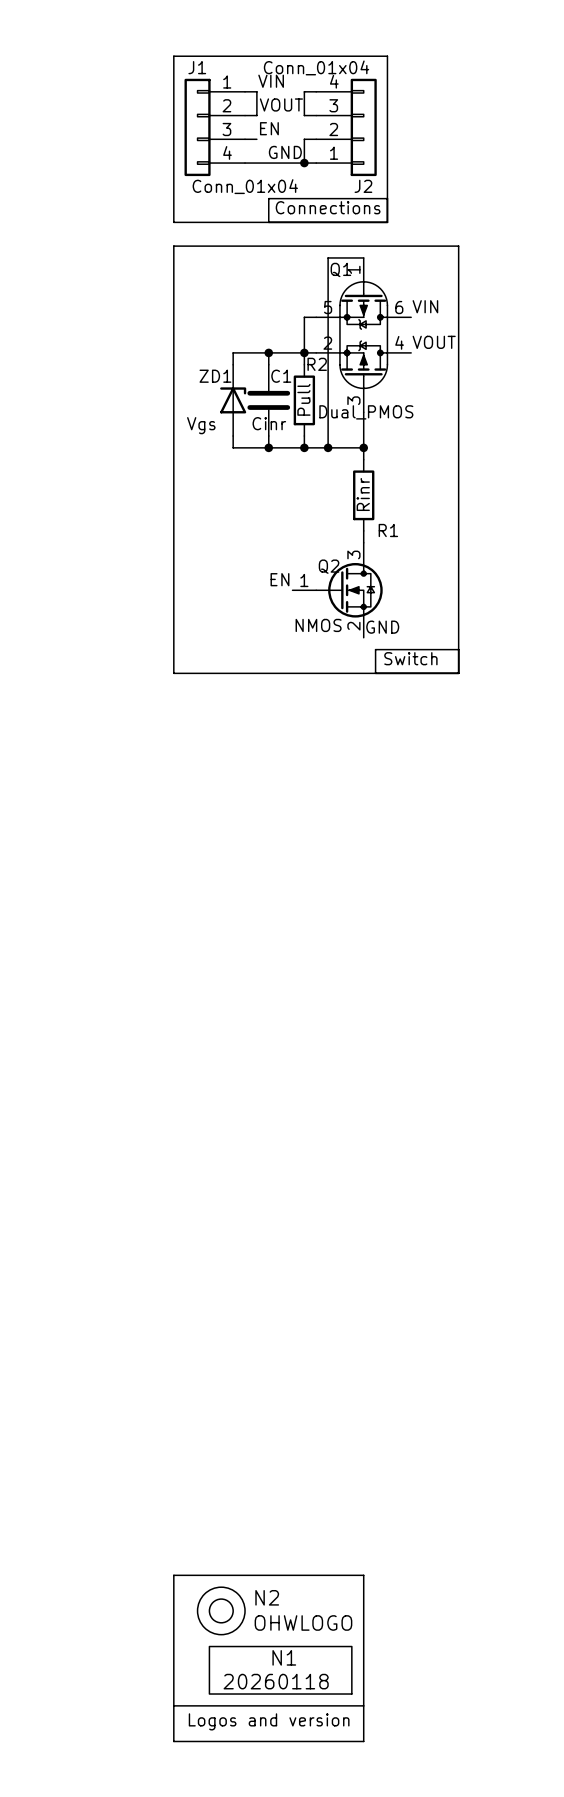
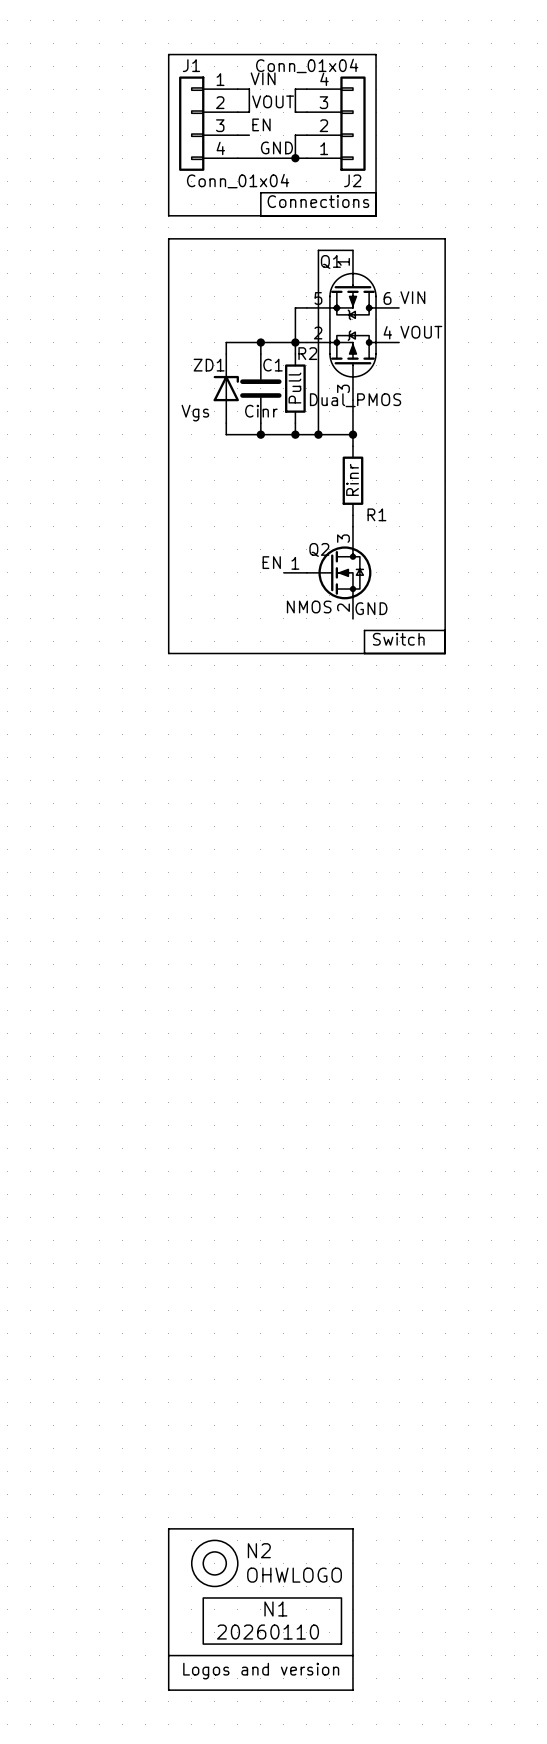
N1 value: 20260118 (276, 1681) -> 20260110 (268, 1632)

